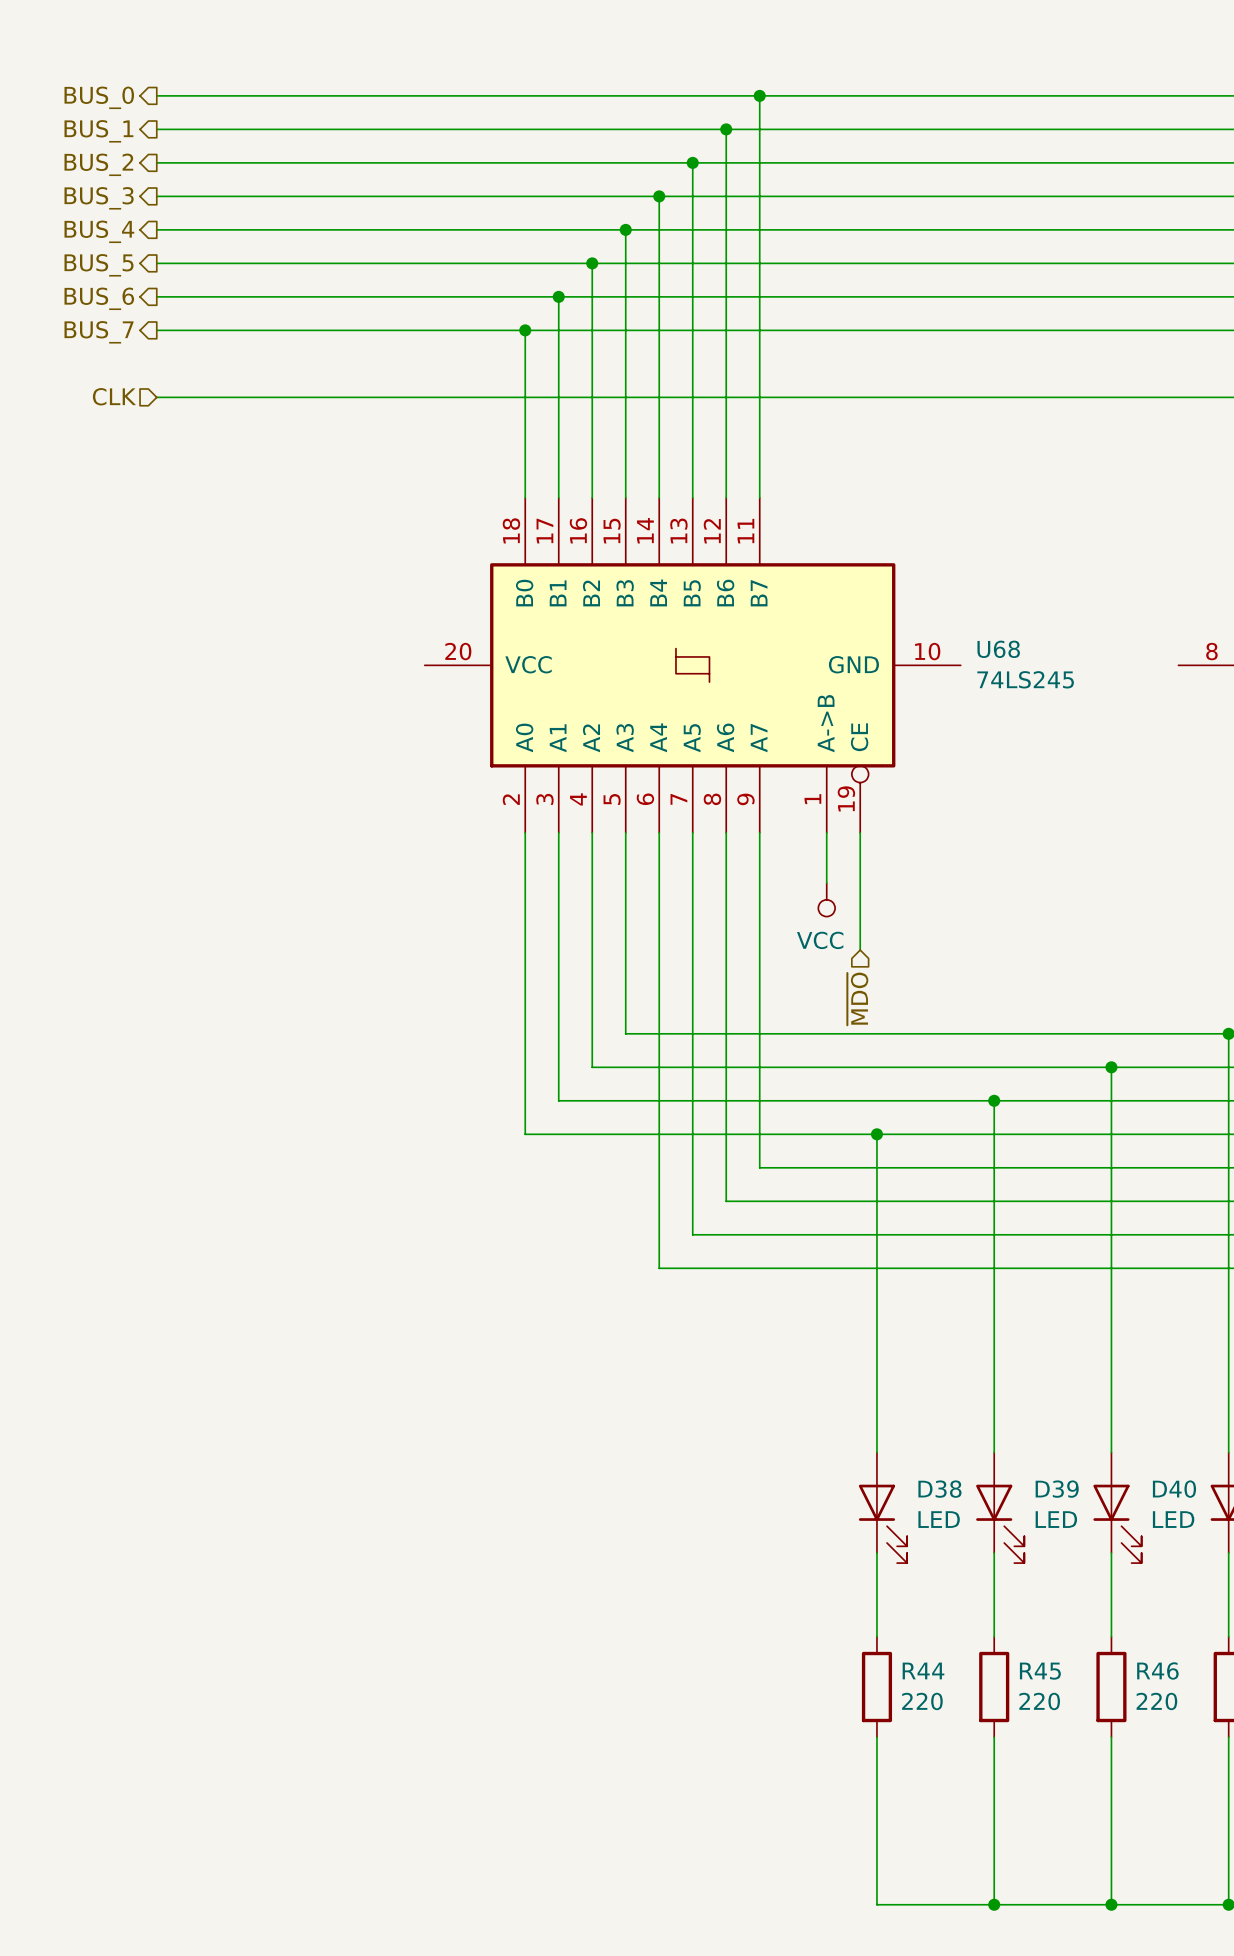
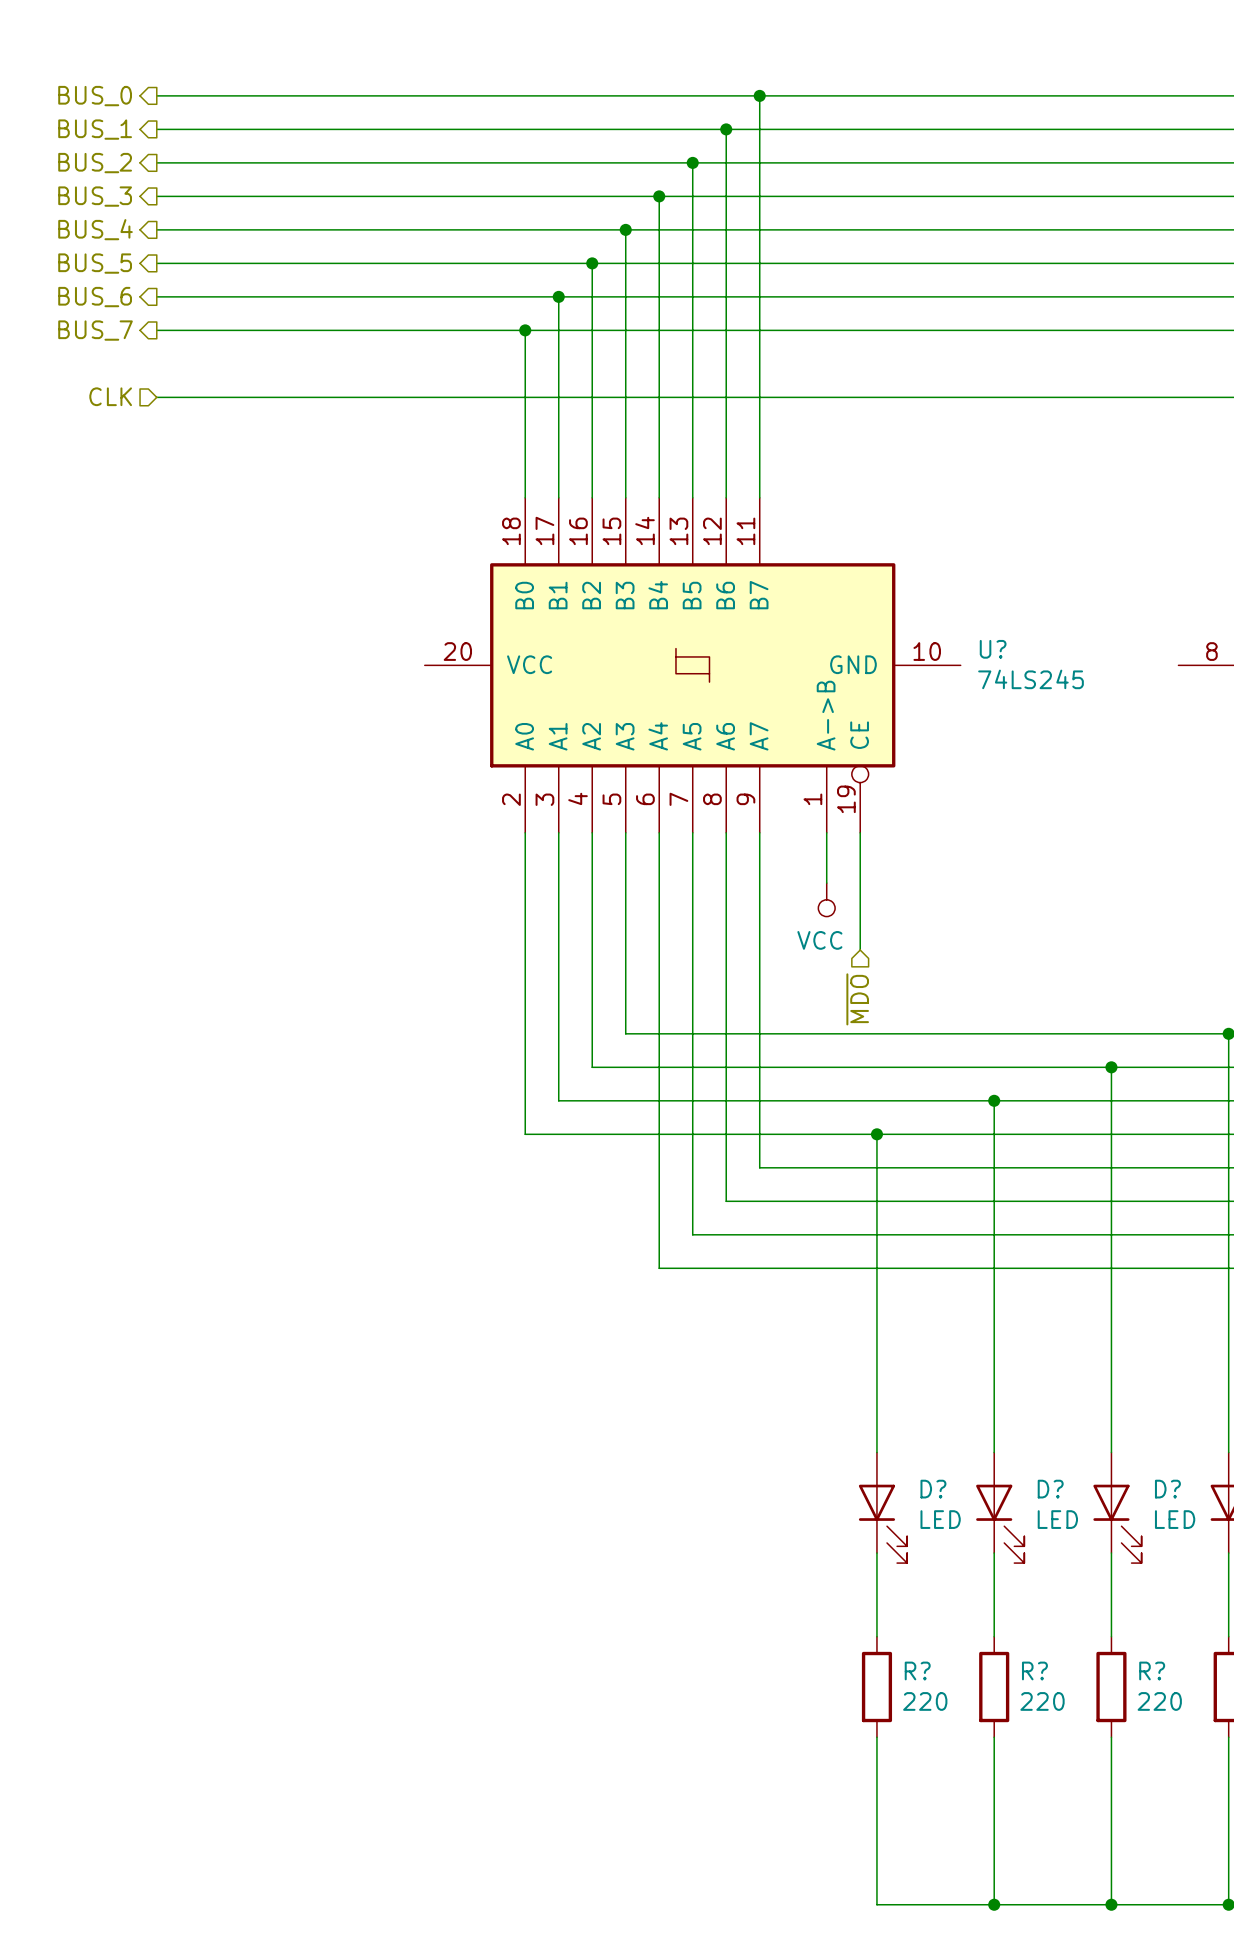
U68 name: U68 (998, 649) -> U? (993, 649)
D38 name: D38 (939, 1489) -> D? (933, 1489)
D39 name: D39 (1057, 1489) -> D? (1050, 1489)
D40 name: D40 (1174, 1489) -> D? (1167, 1489)
R44 name: R44 (923, 1670) -> R? (917, 1670)
R46 name: R46 (1157, 1670) -> R? (1152, 1670)
R45 name: R45 (1040, 1671) -> R? (1034, 1670)

